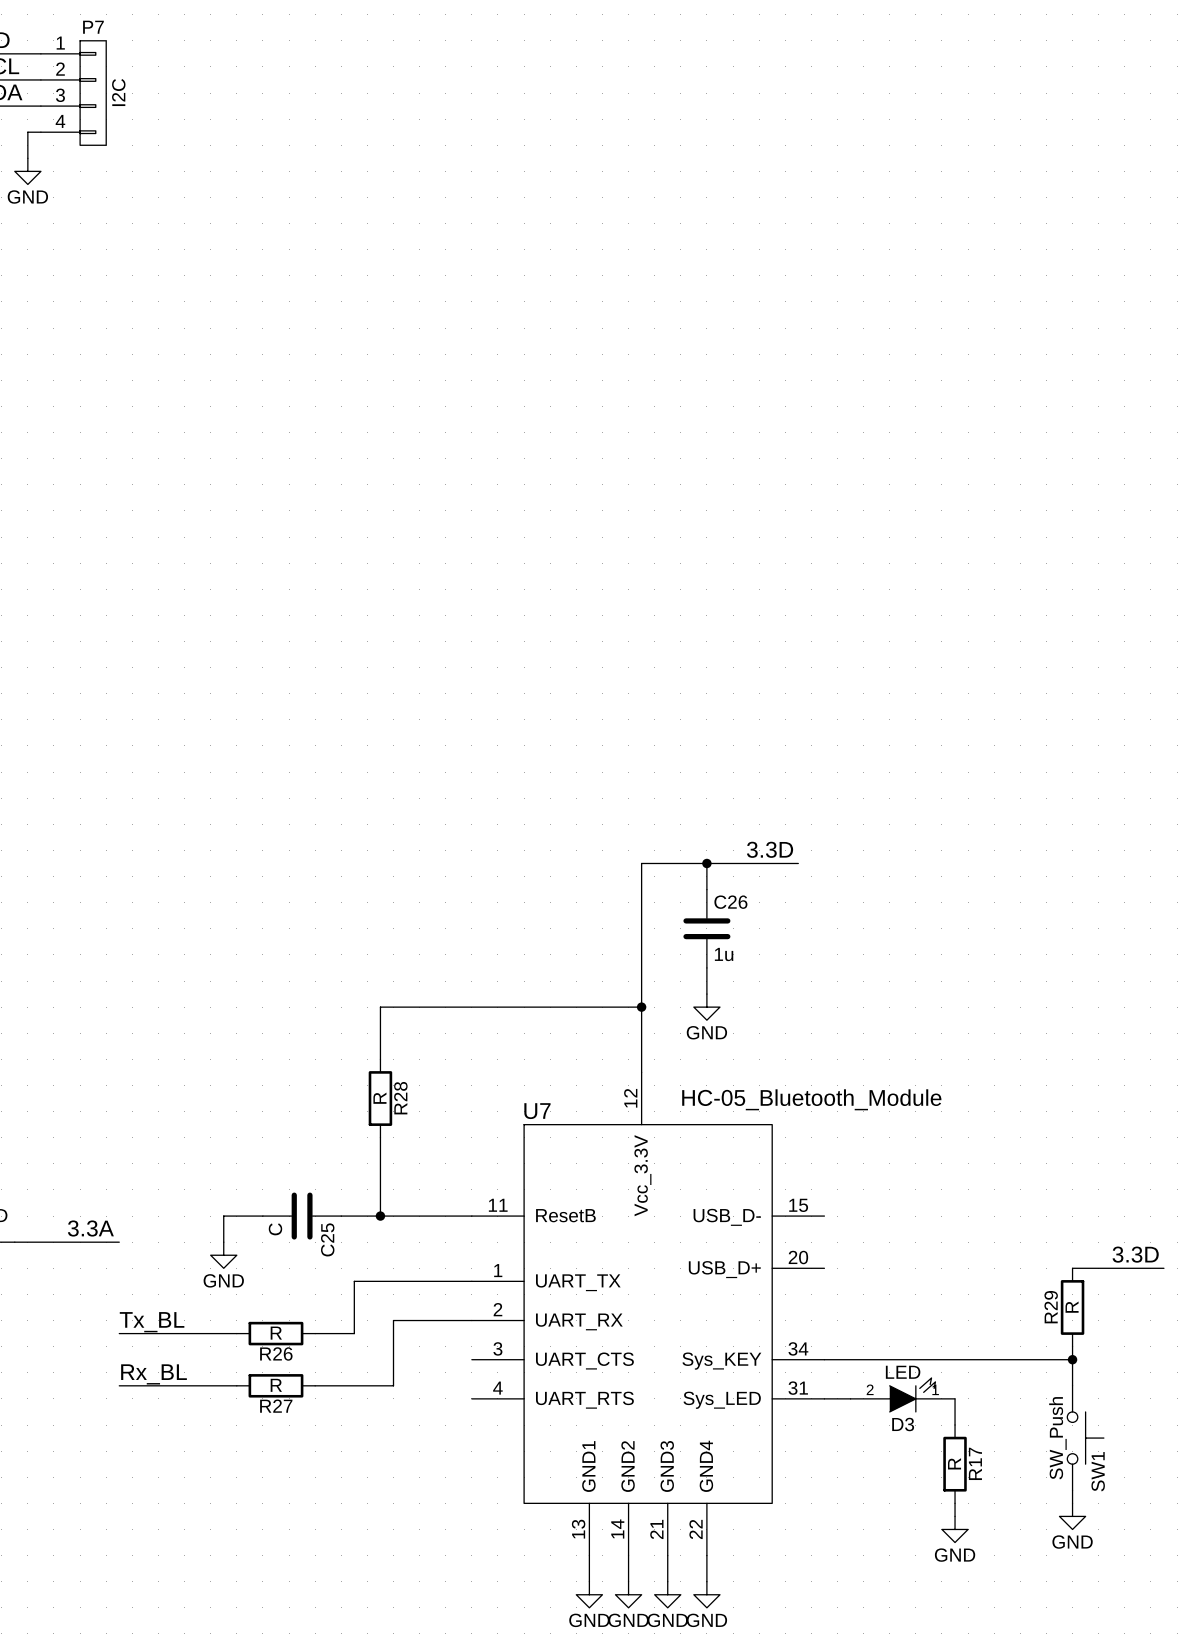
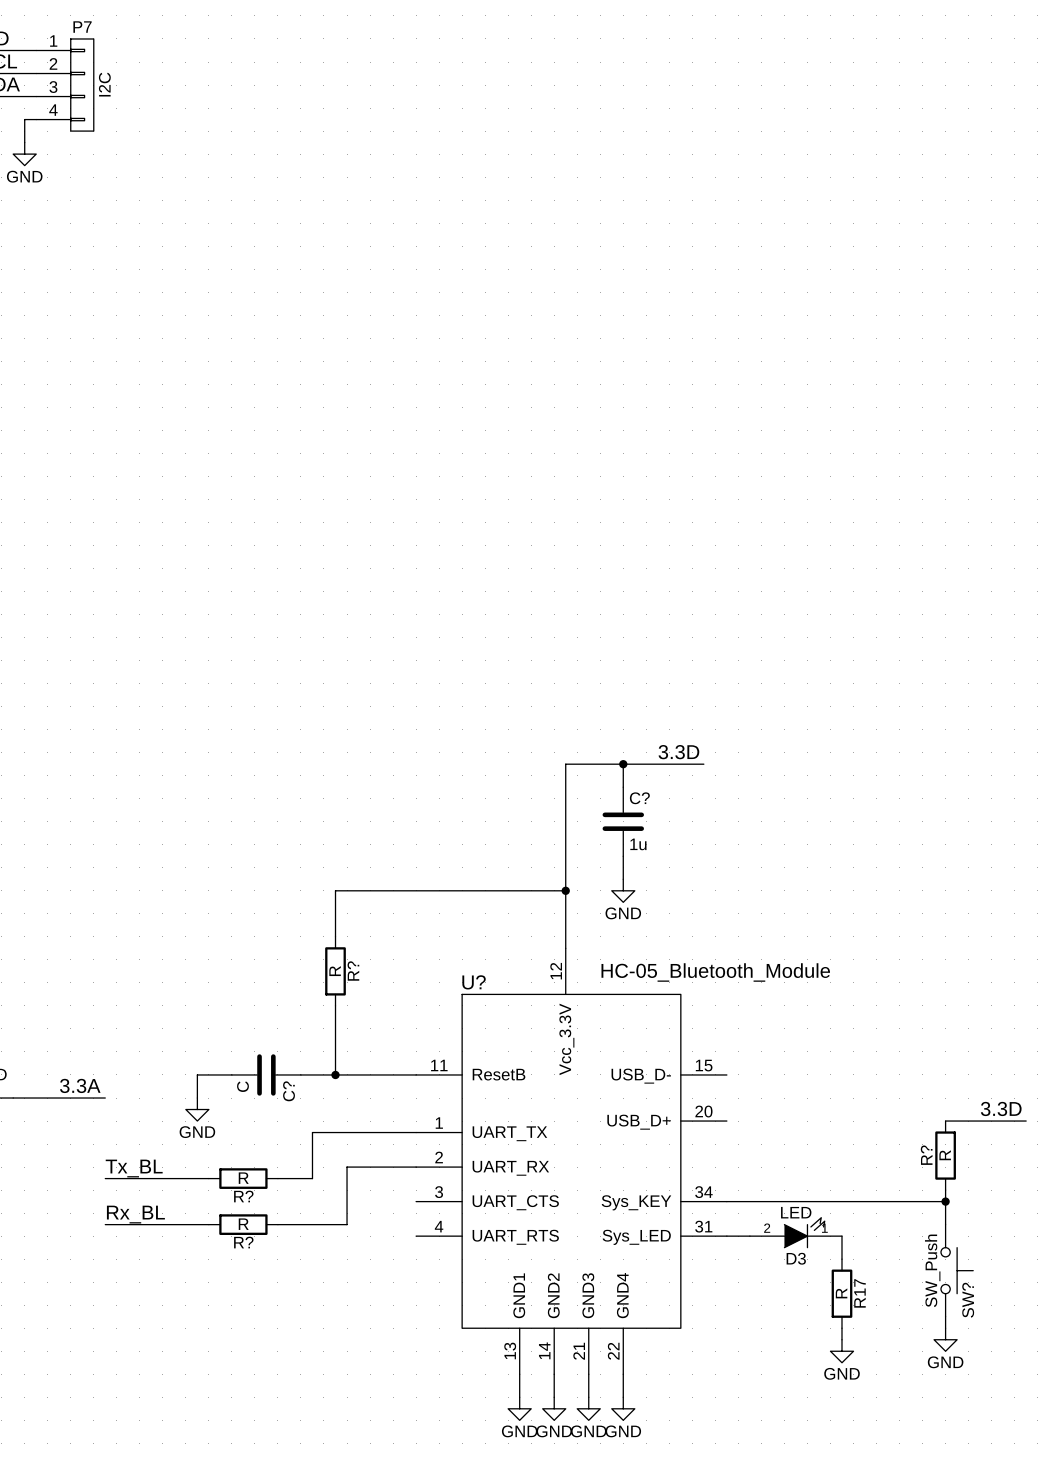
C26 name: C26 (730, 902) -> C? (639, 798)
R28 name: R28 (400, 1098) -> R? (353, 971)
U7 name: U7 (537, 1111) -> U? (474, 982)
C25 name: C25 (327, 1239) -> C? (289, 1091)
R29 name: R29 (1051, 1307) -> R? (926, 1155)
R26 name: R26 (276, 1353) -> R? (243, 1196)
R27 name: R27 (276, 1406) -> R? (243, 1242)
SW1 name: SW1 (1098, 1471) -> SW? (968, 1300)

